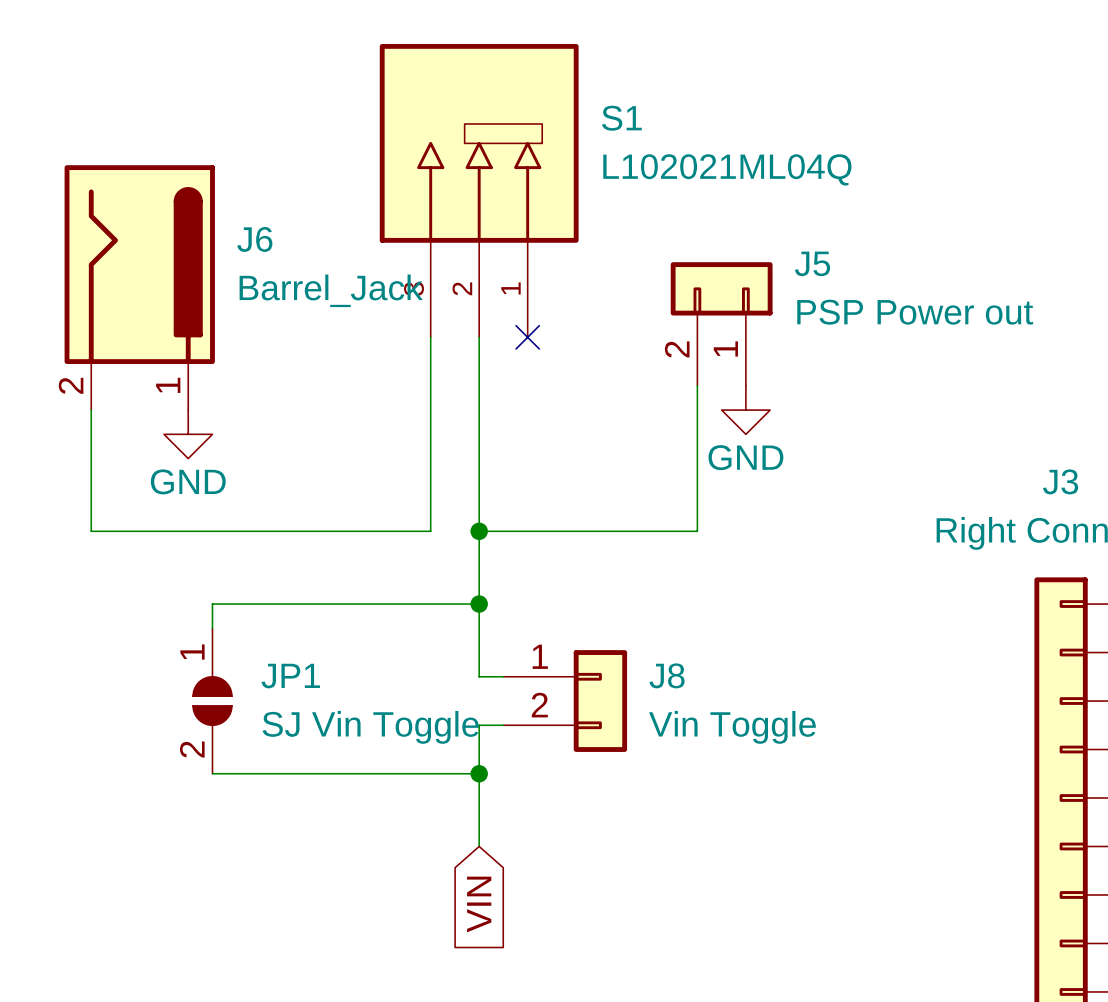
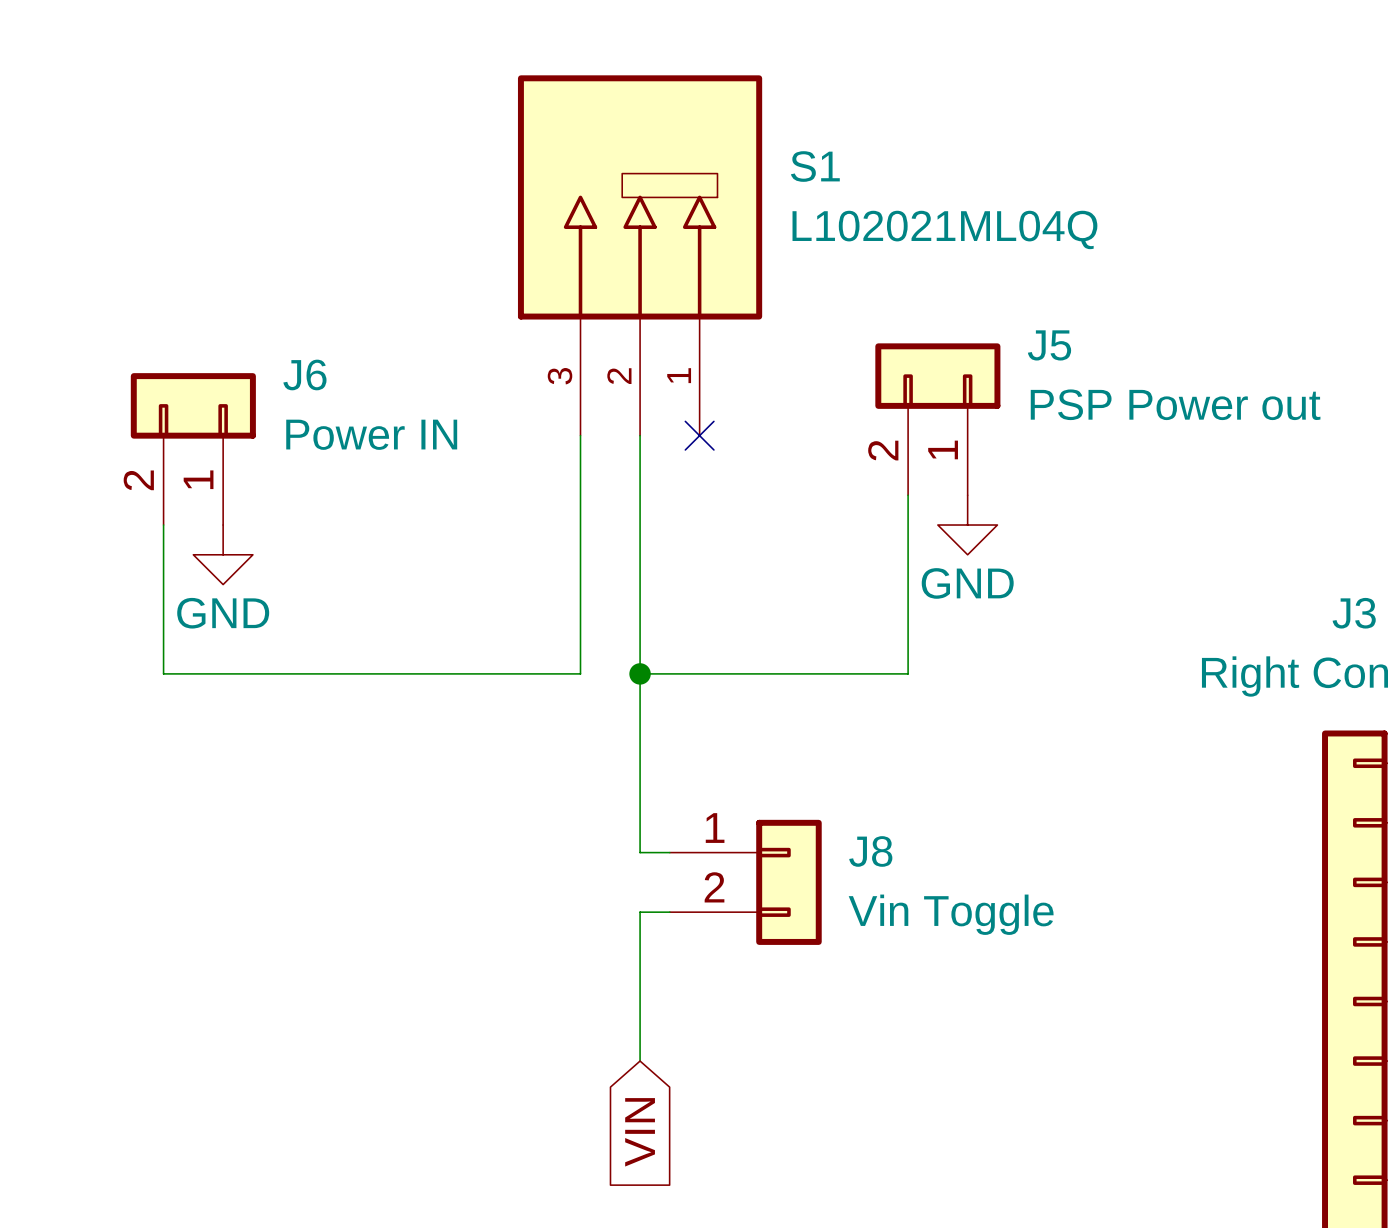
J6 symbol: [64, 165, 215, 411] -> [130, 373, 256, 526]
J6 value: Barrel_Jack (331, 290) -> Power IN (371, 434)
power symbol position: GND (188, 434) -> GND (223, 554)
wire: (479, 604) (212, 604) (212, 628) -> none
junction: (479, 604) -> none
JP1: SJ Vin Toggle (212, 701) -> none
wire: (212, 773) (479, 773) -> none
junction: (479, 773) -> none

